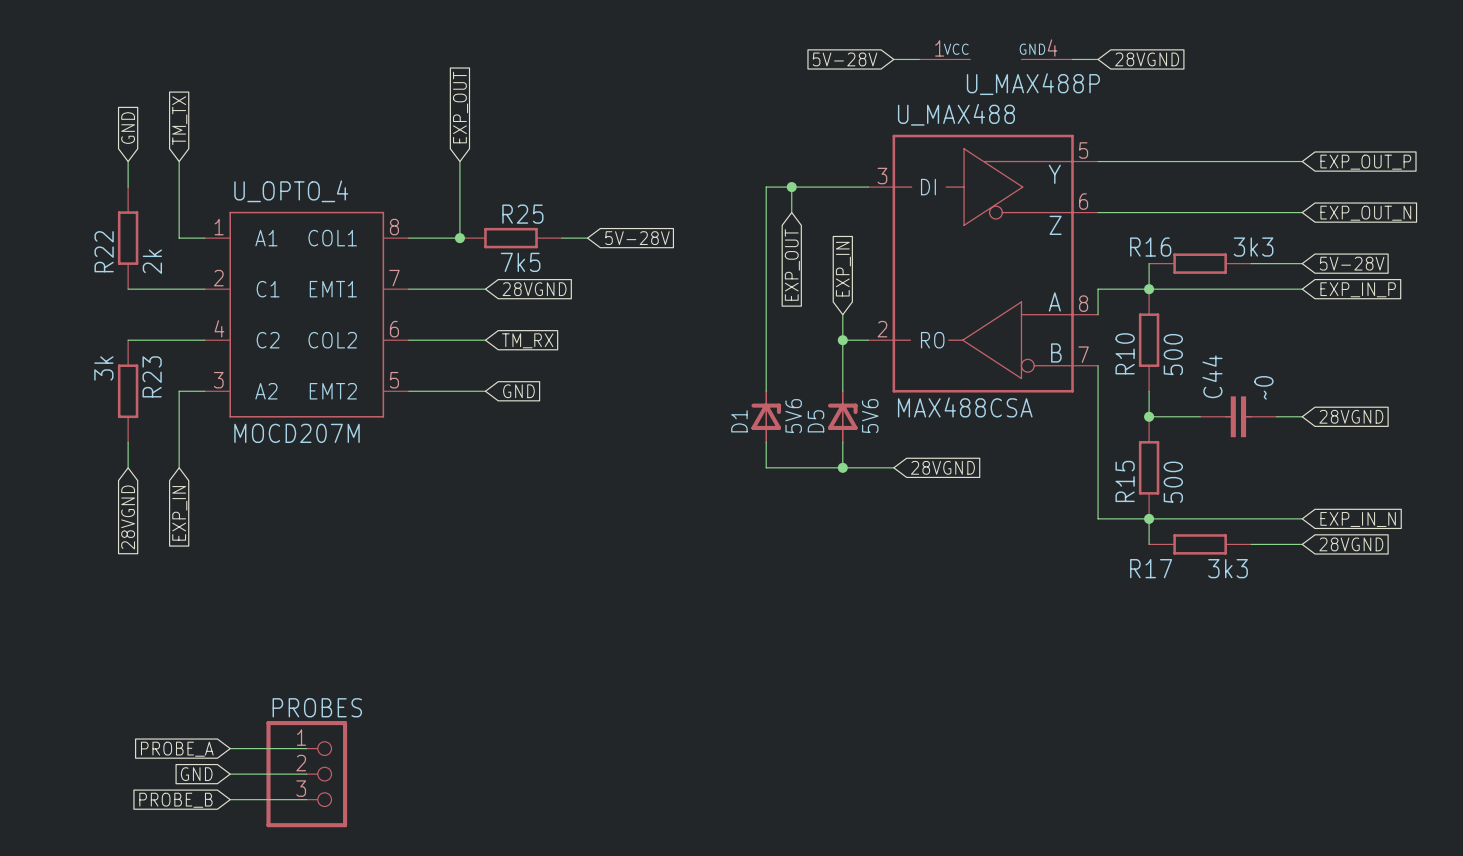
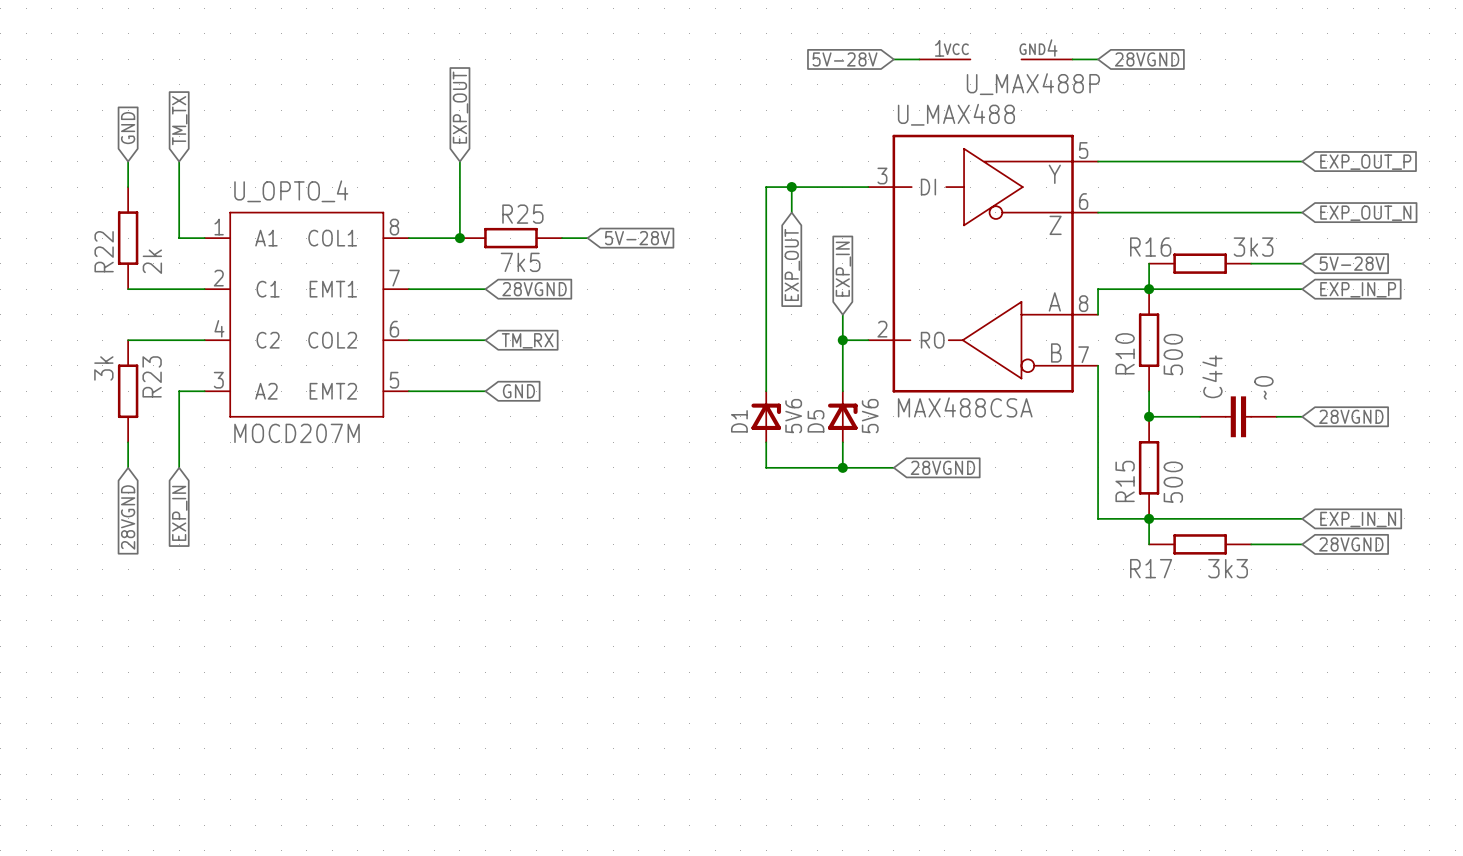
wire: (230, 748) (306, 748) -> none
global label: PROBE_A (177, 749) -> none
global label: GND (196, 774) -> none
wire: (230, 774) (306, 774) -> none
PROBES: (306, 774) -> none
wire: (230, 799) (306, 799) -> none
global label: PROBE_B (175, 800) -> none

